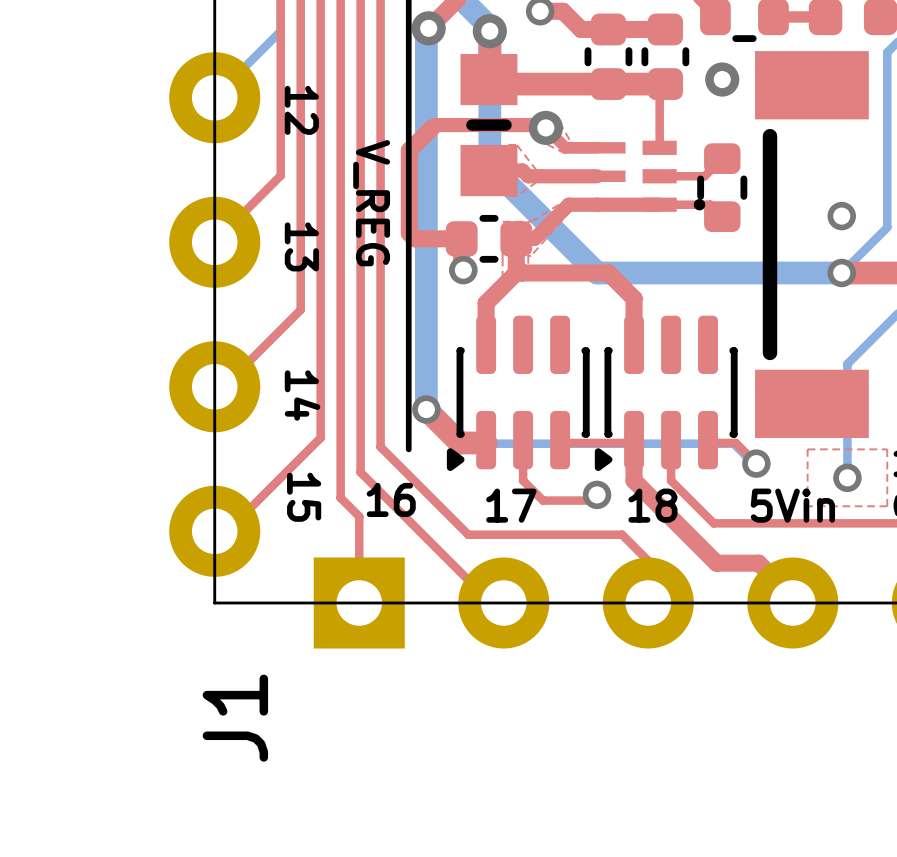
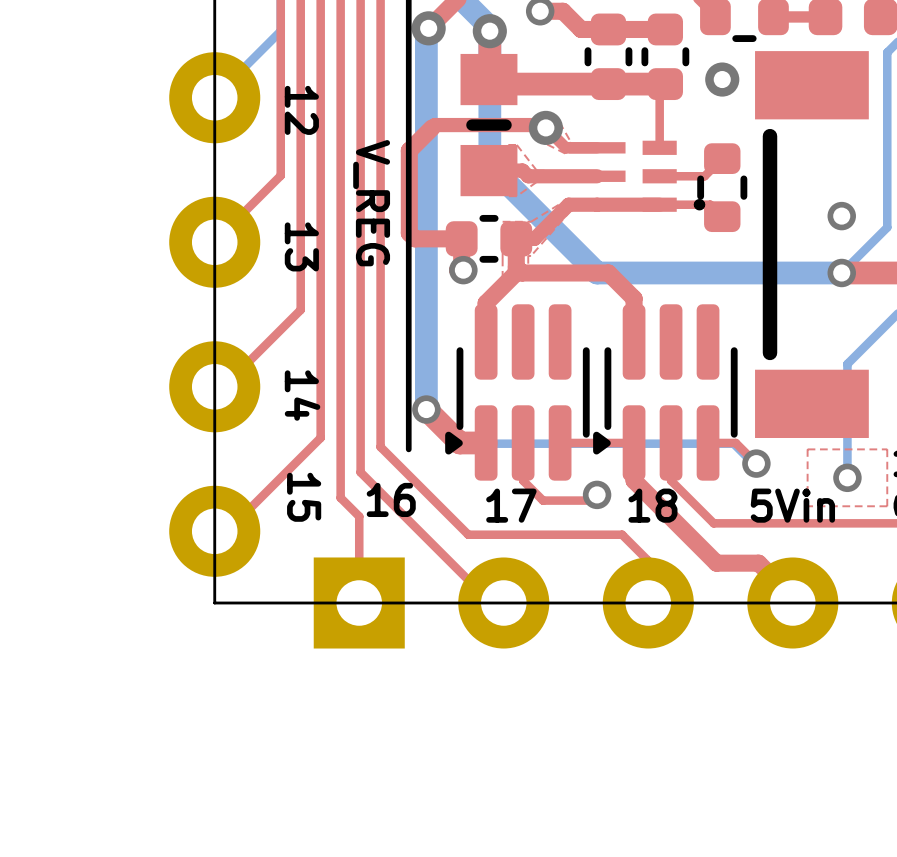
part footprint: [446, 315, 590, 472] -> [445, 304, 590, 481]
part footprint: [594, 315, 738, 472] -> [593, 304, 738, 481]
J1 name: J1 (235, 718) -> none

